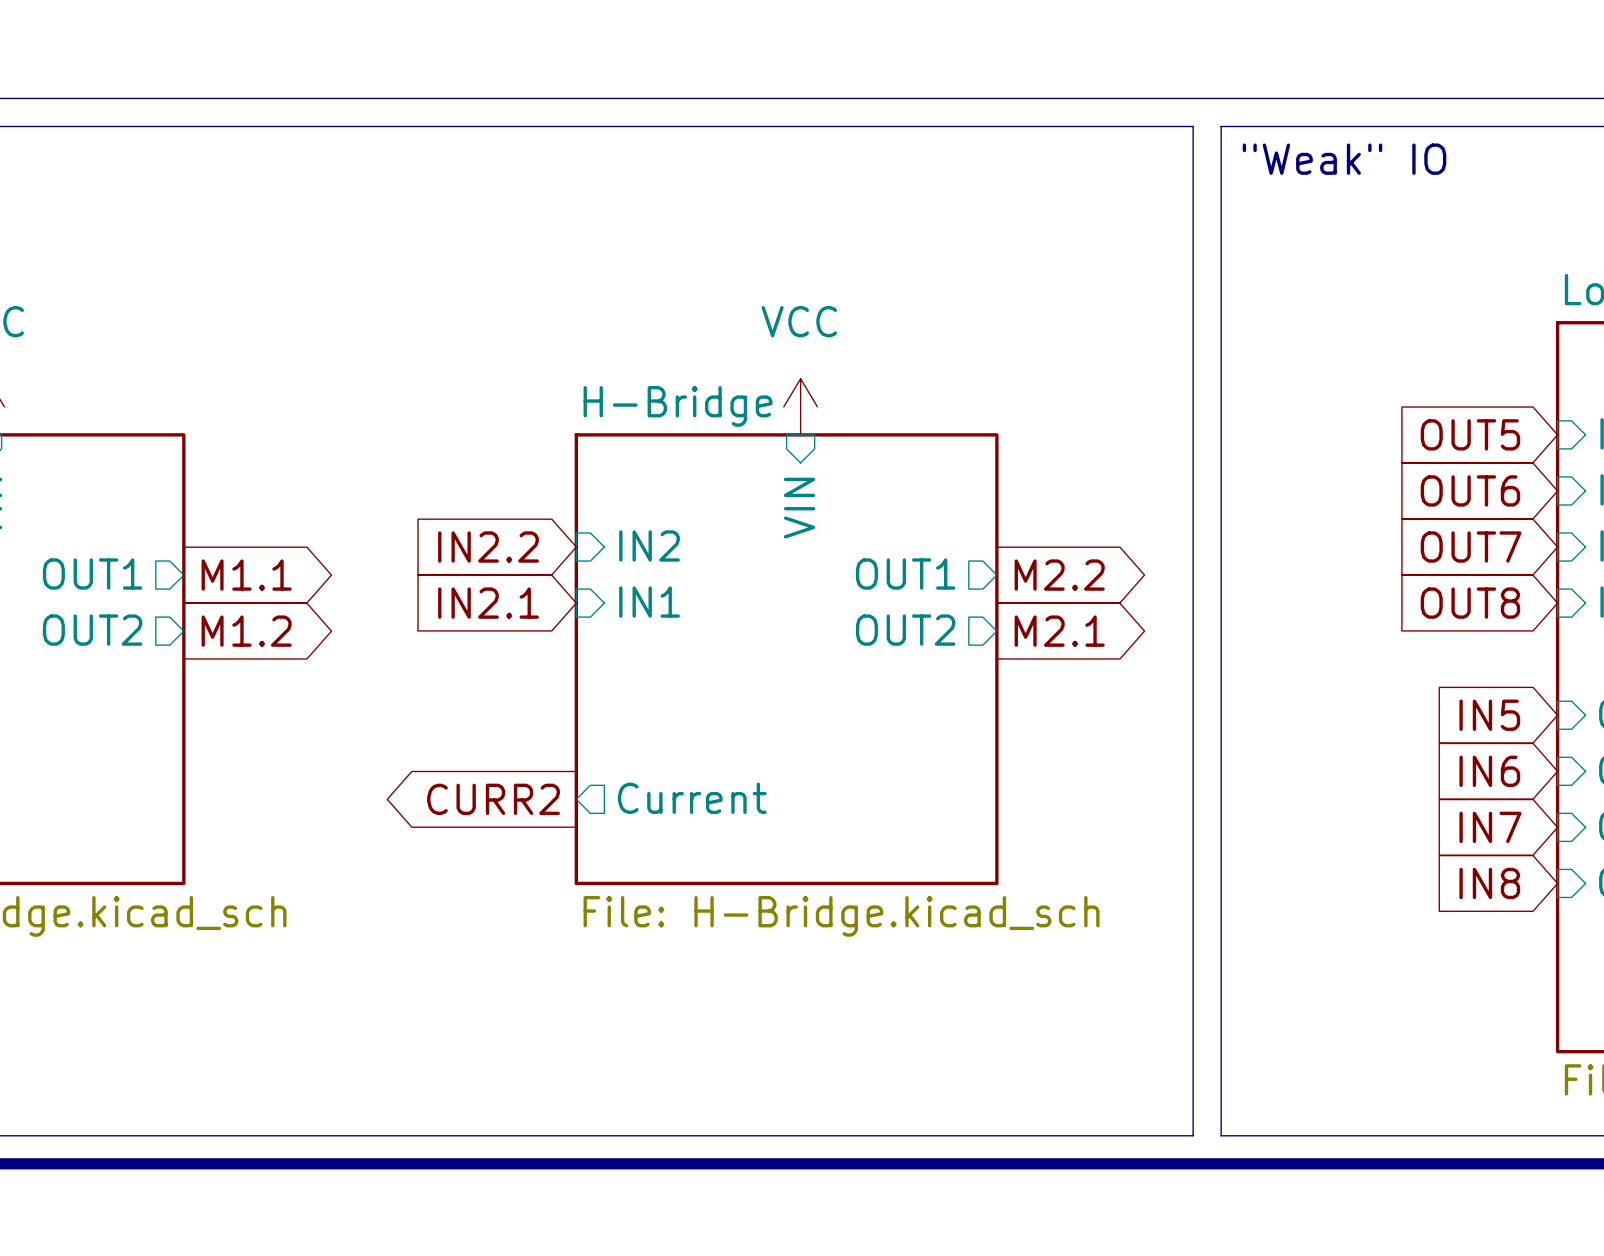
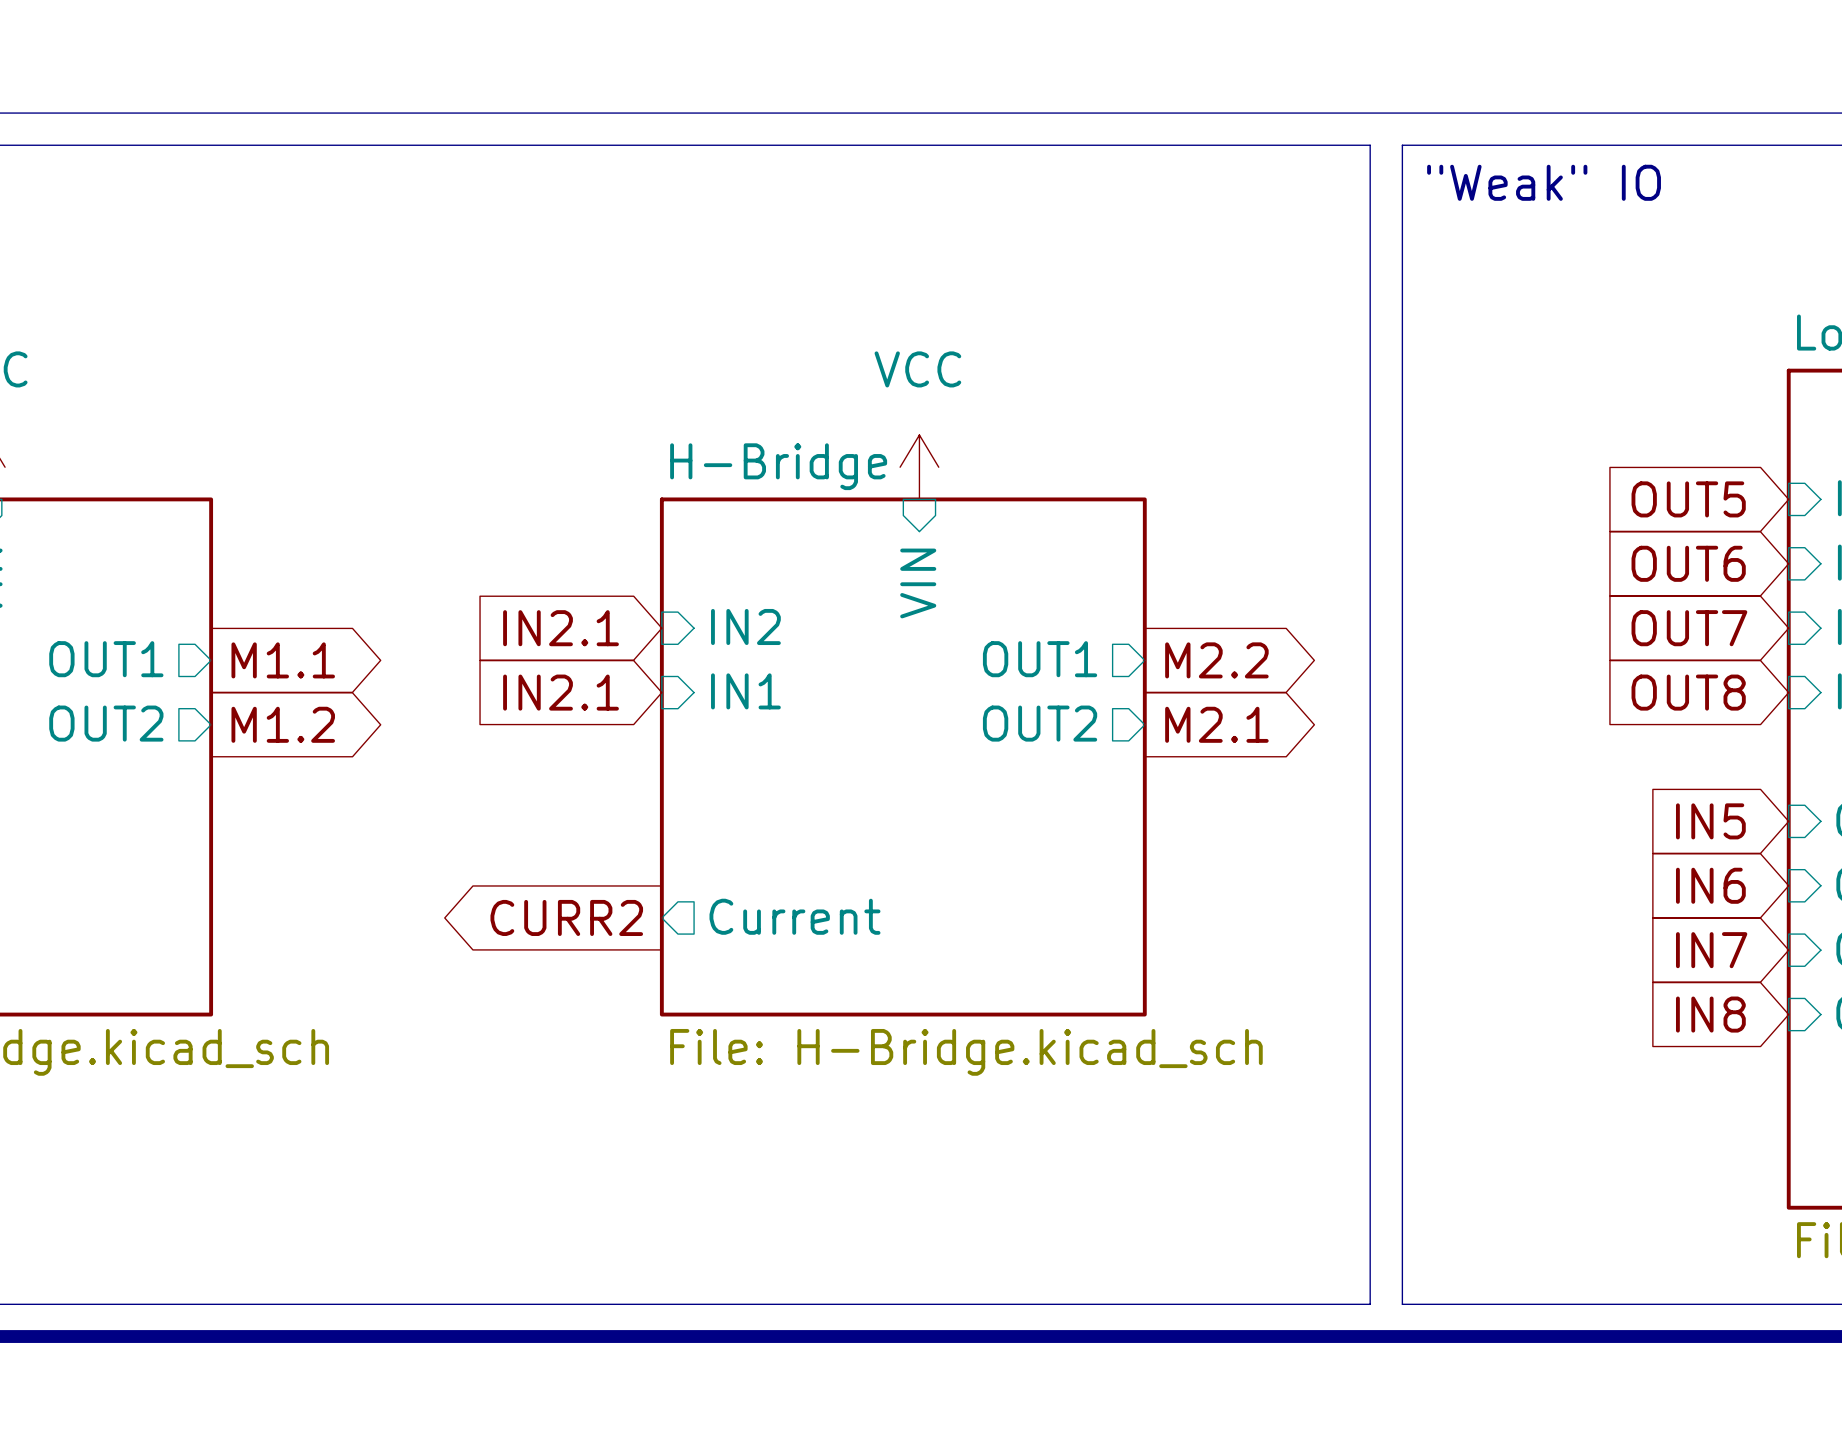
global label: IN2.2 (488, 547) -> IN2.1 (561, 628)

